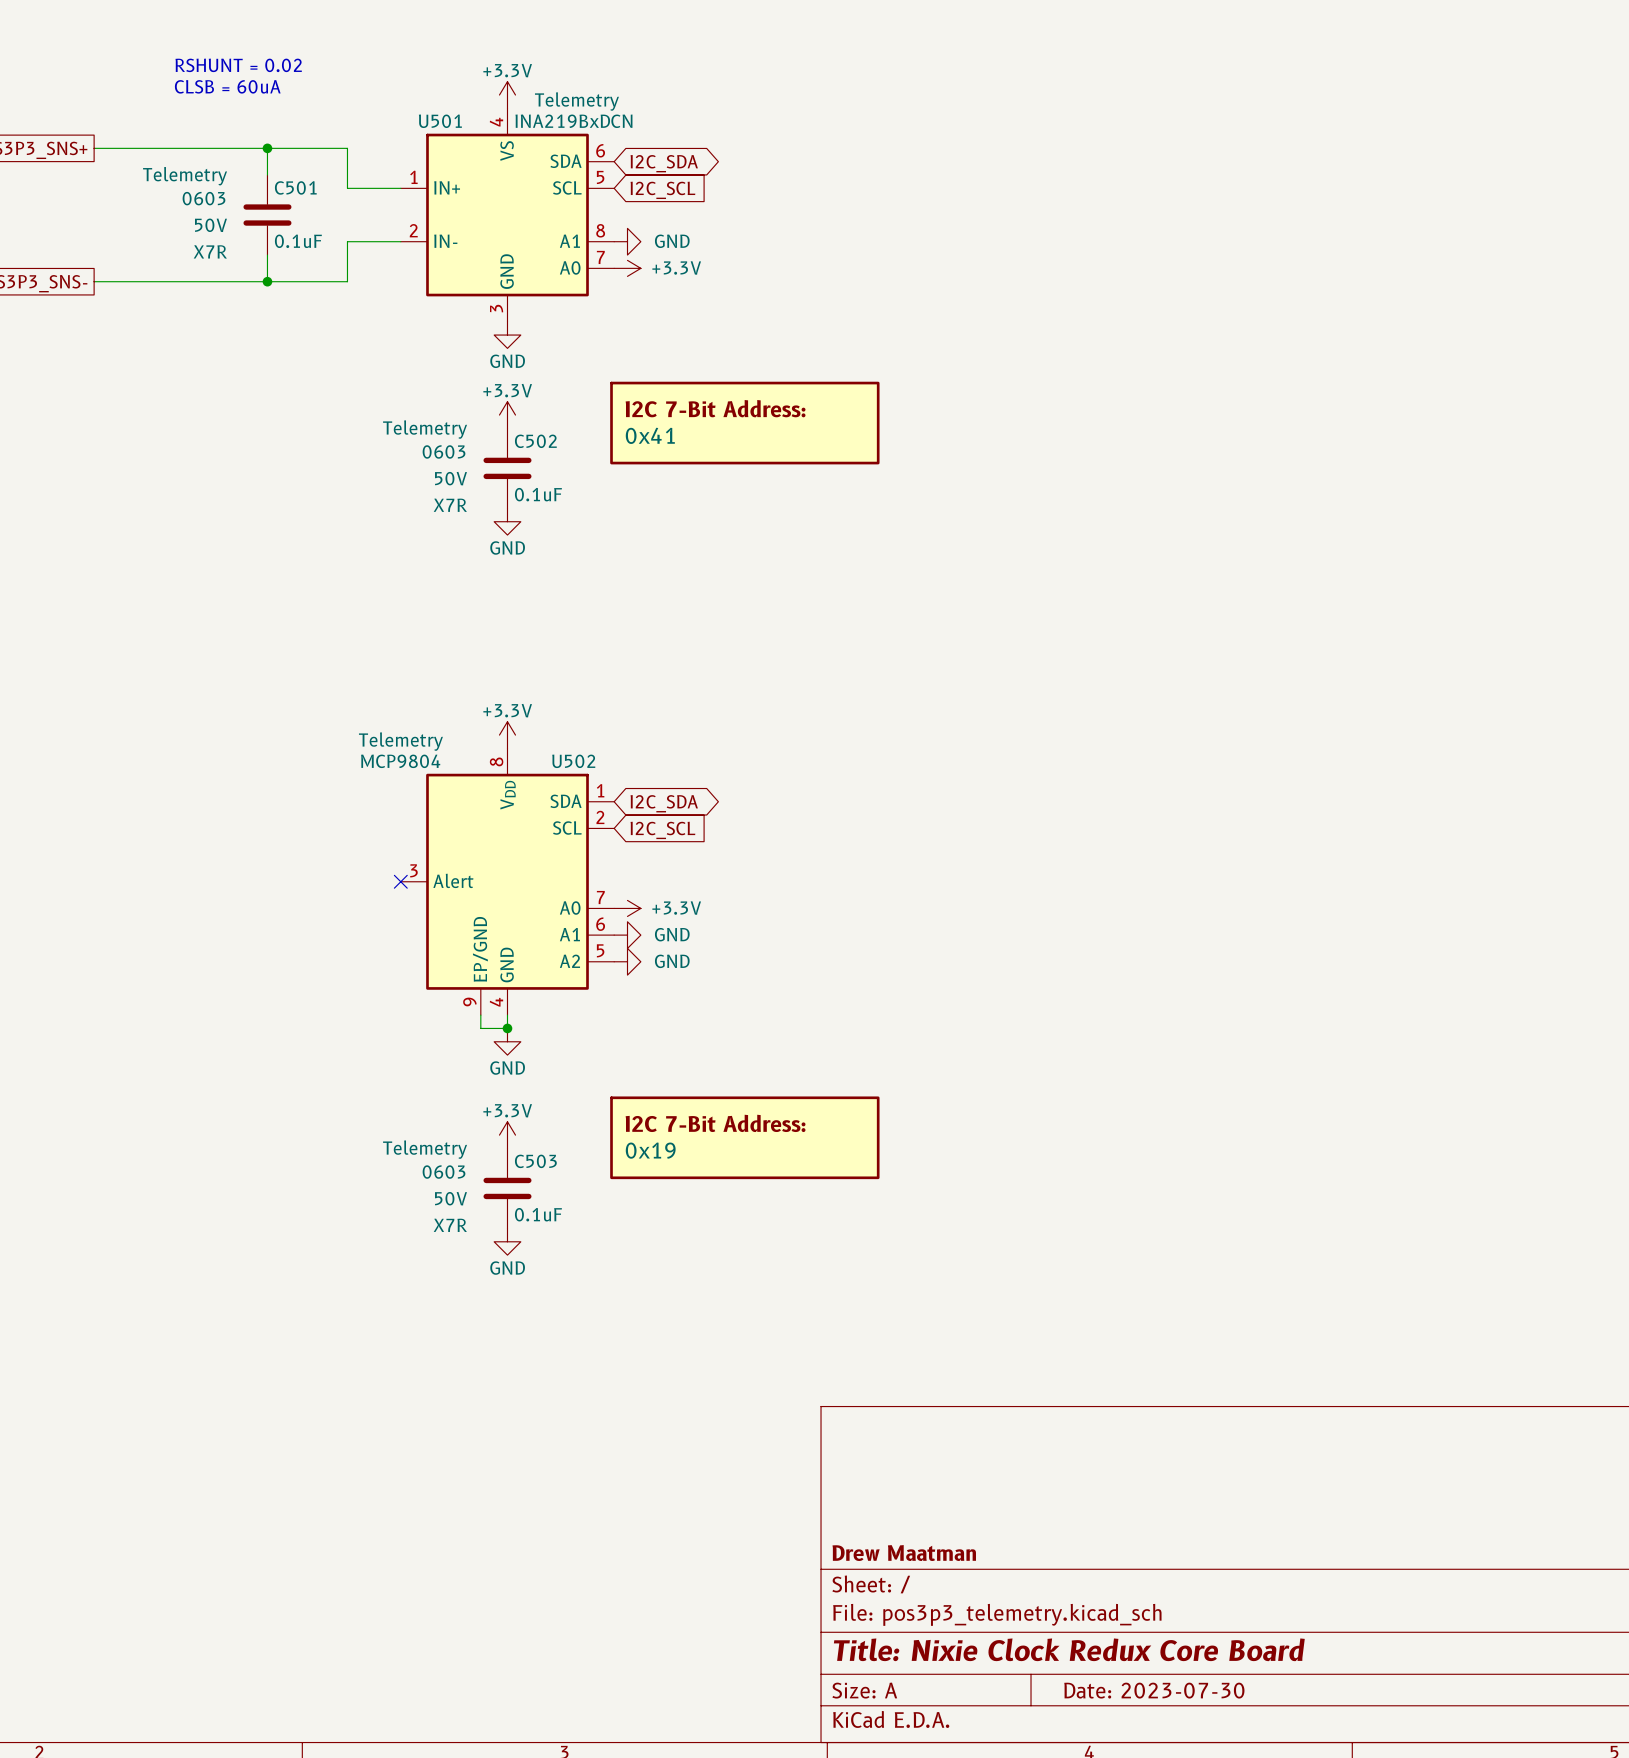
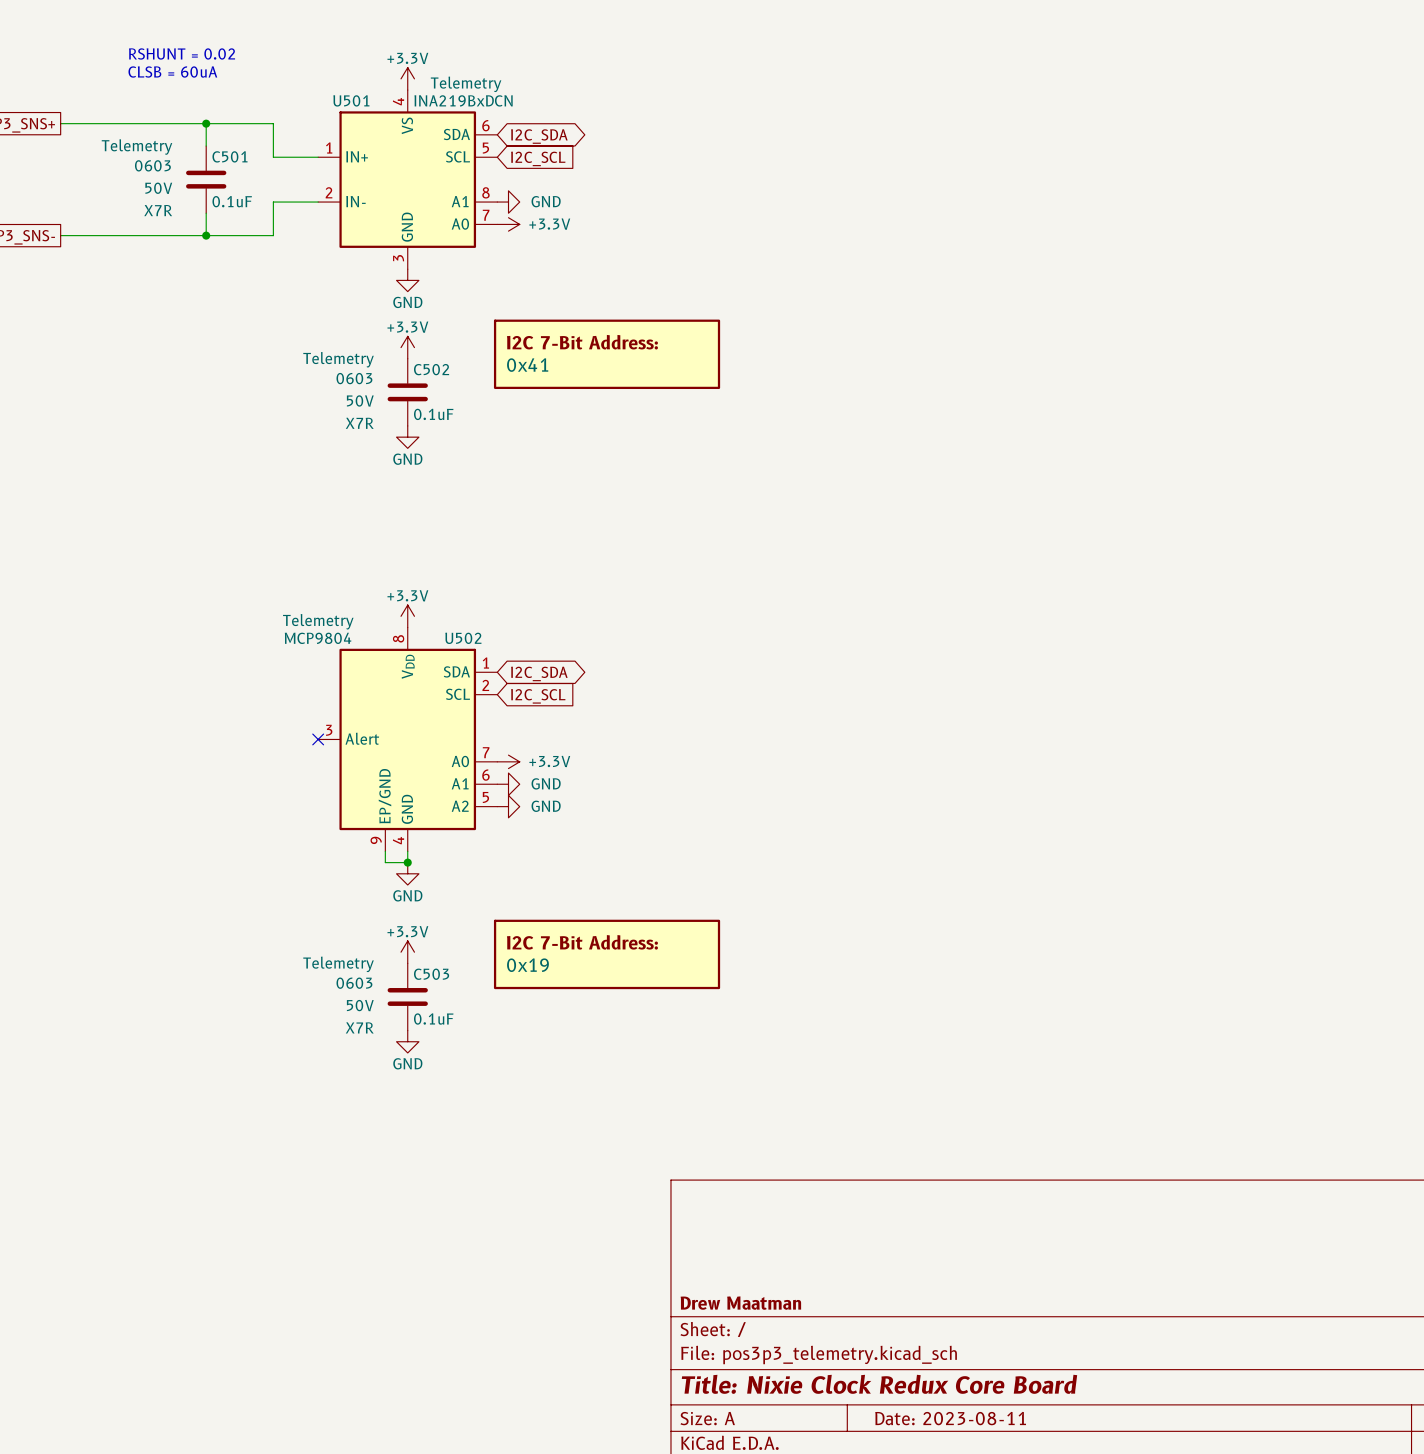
title block: Date: 2023-07-30 (1154, 1690) -> Date: 2023-08-11 (950, 1418)

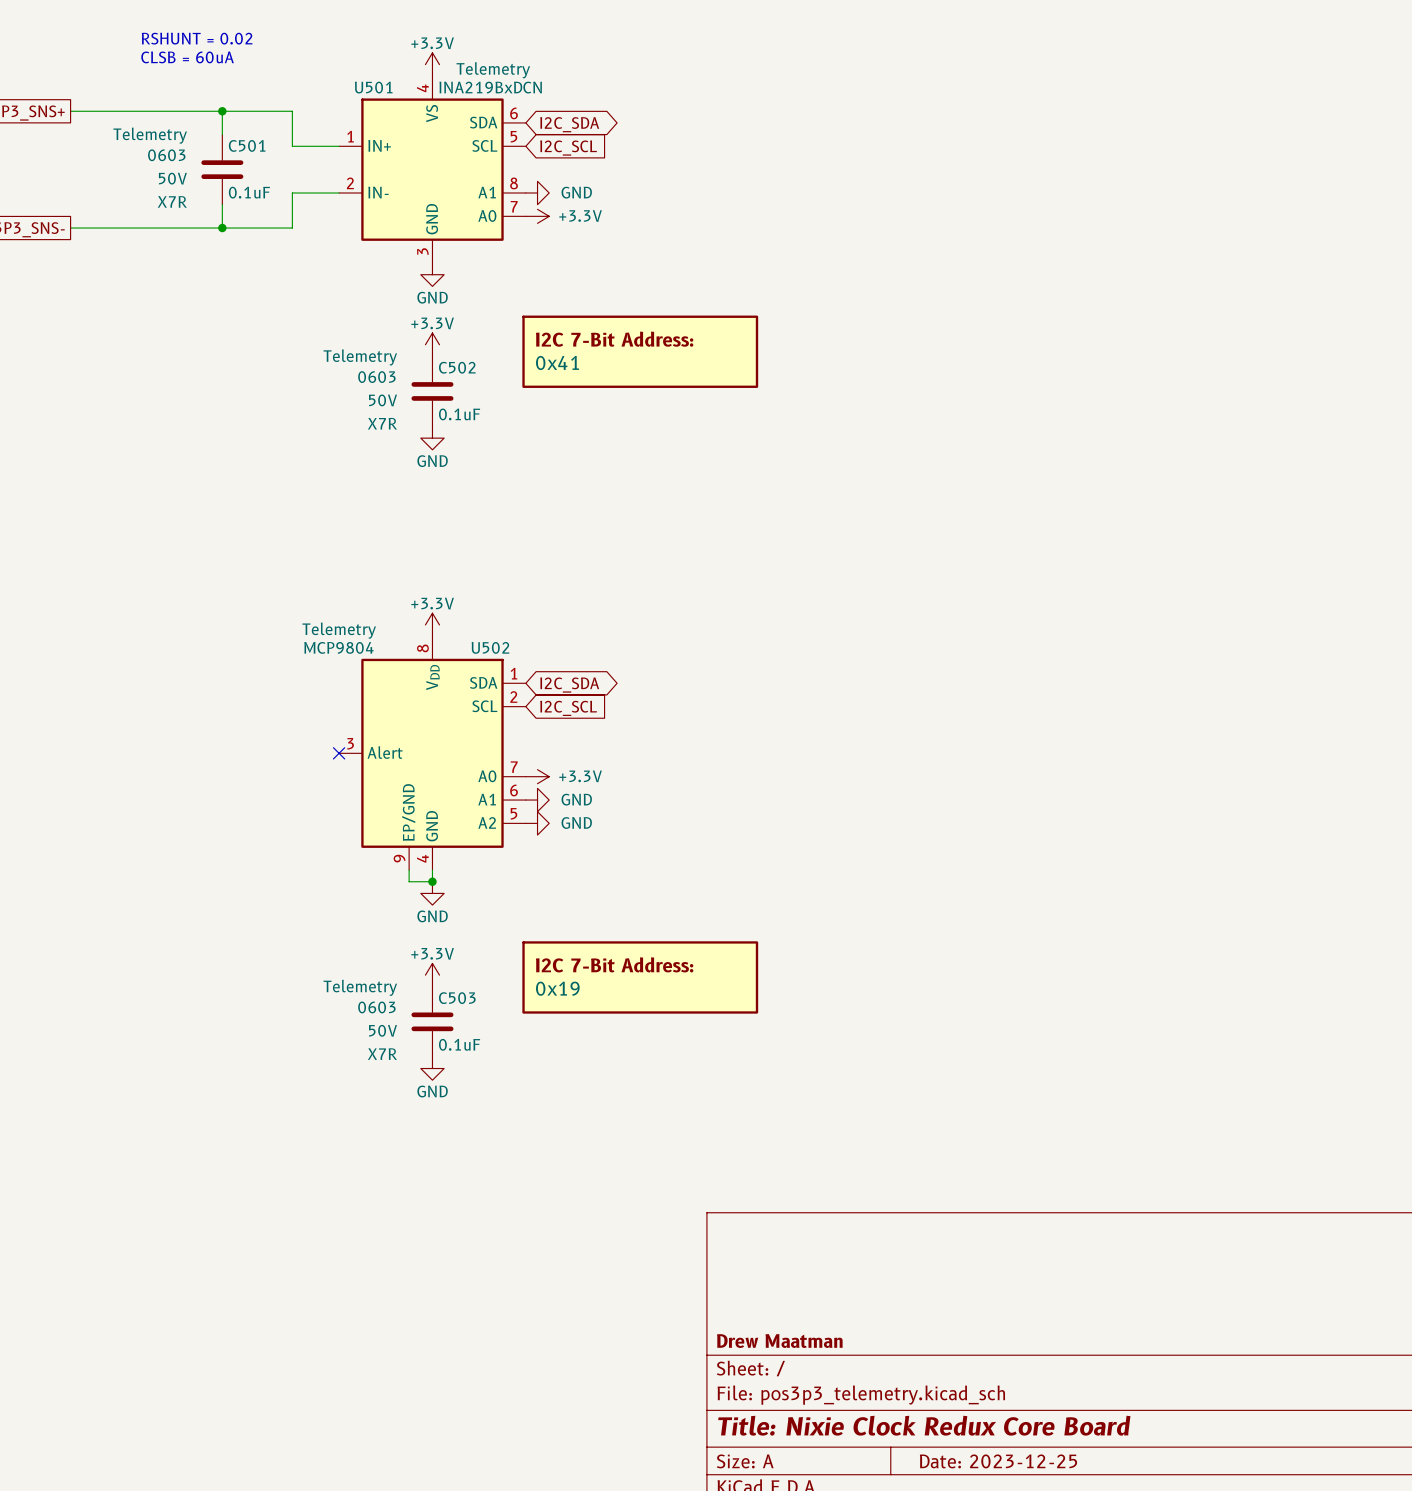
title block: Date: 2023-08-11 (950, 1418) -> Date: 2023-12-25 (998, 1461)

